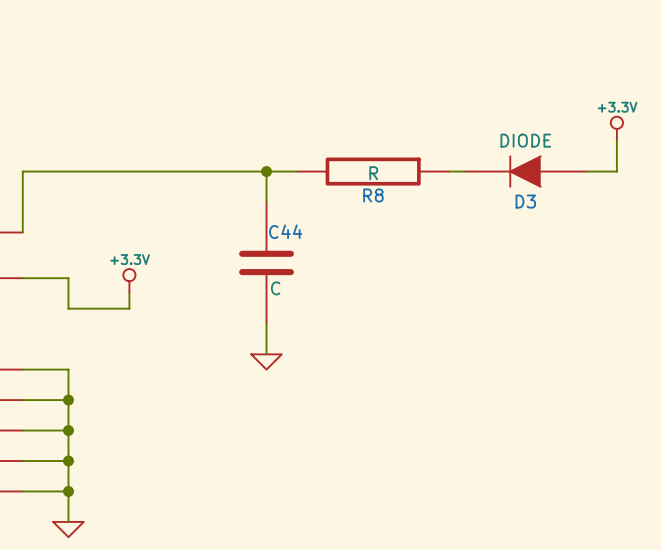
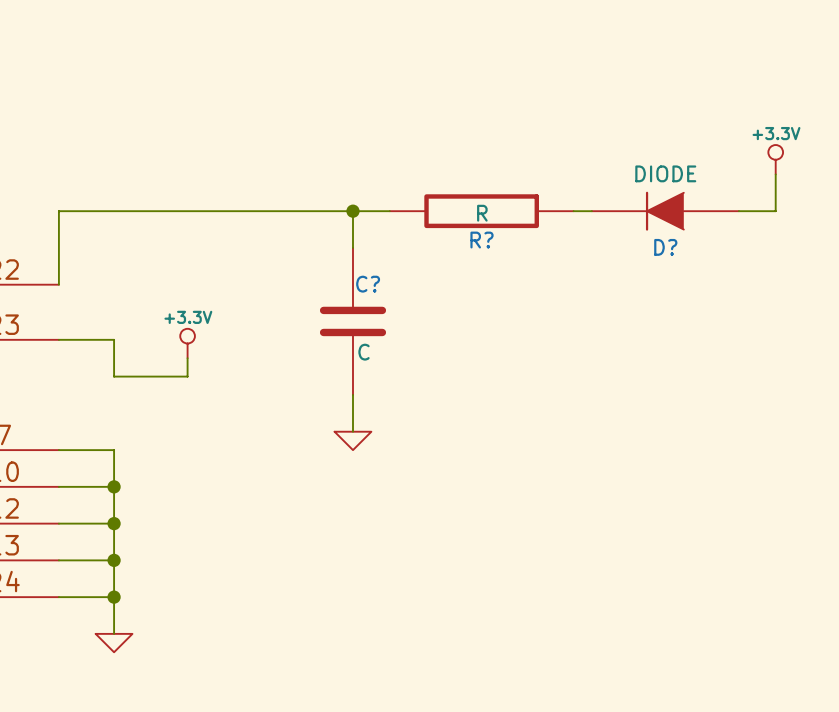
R8 name: R8 (373, 195) -> R? (481, 240)
D3 name: D3 (525, 201) -> D? (665, 247)
C44 name: C44 (285, 231) -> C? (368, 284)

